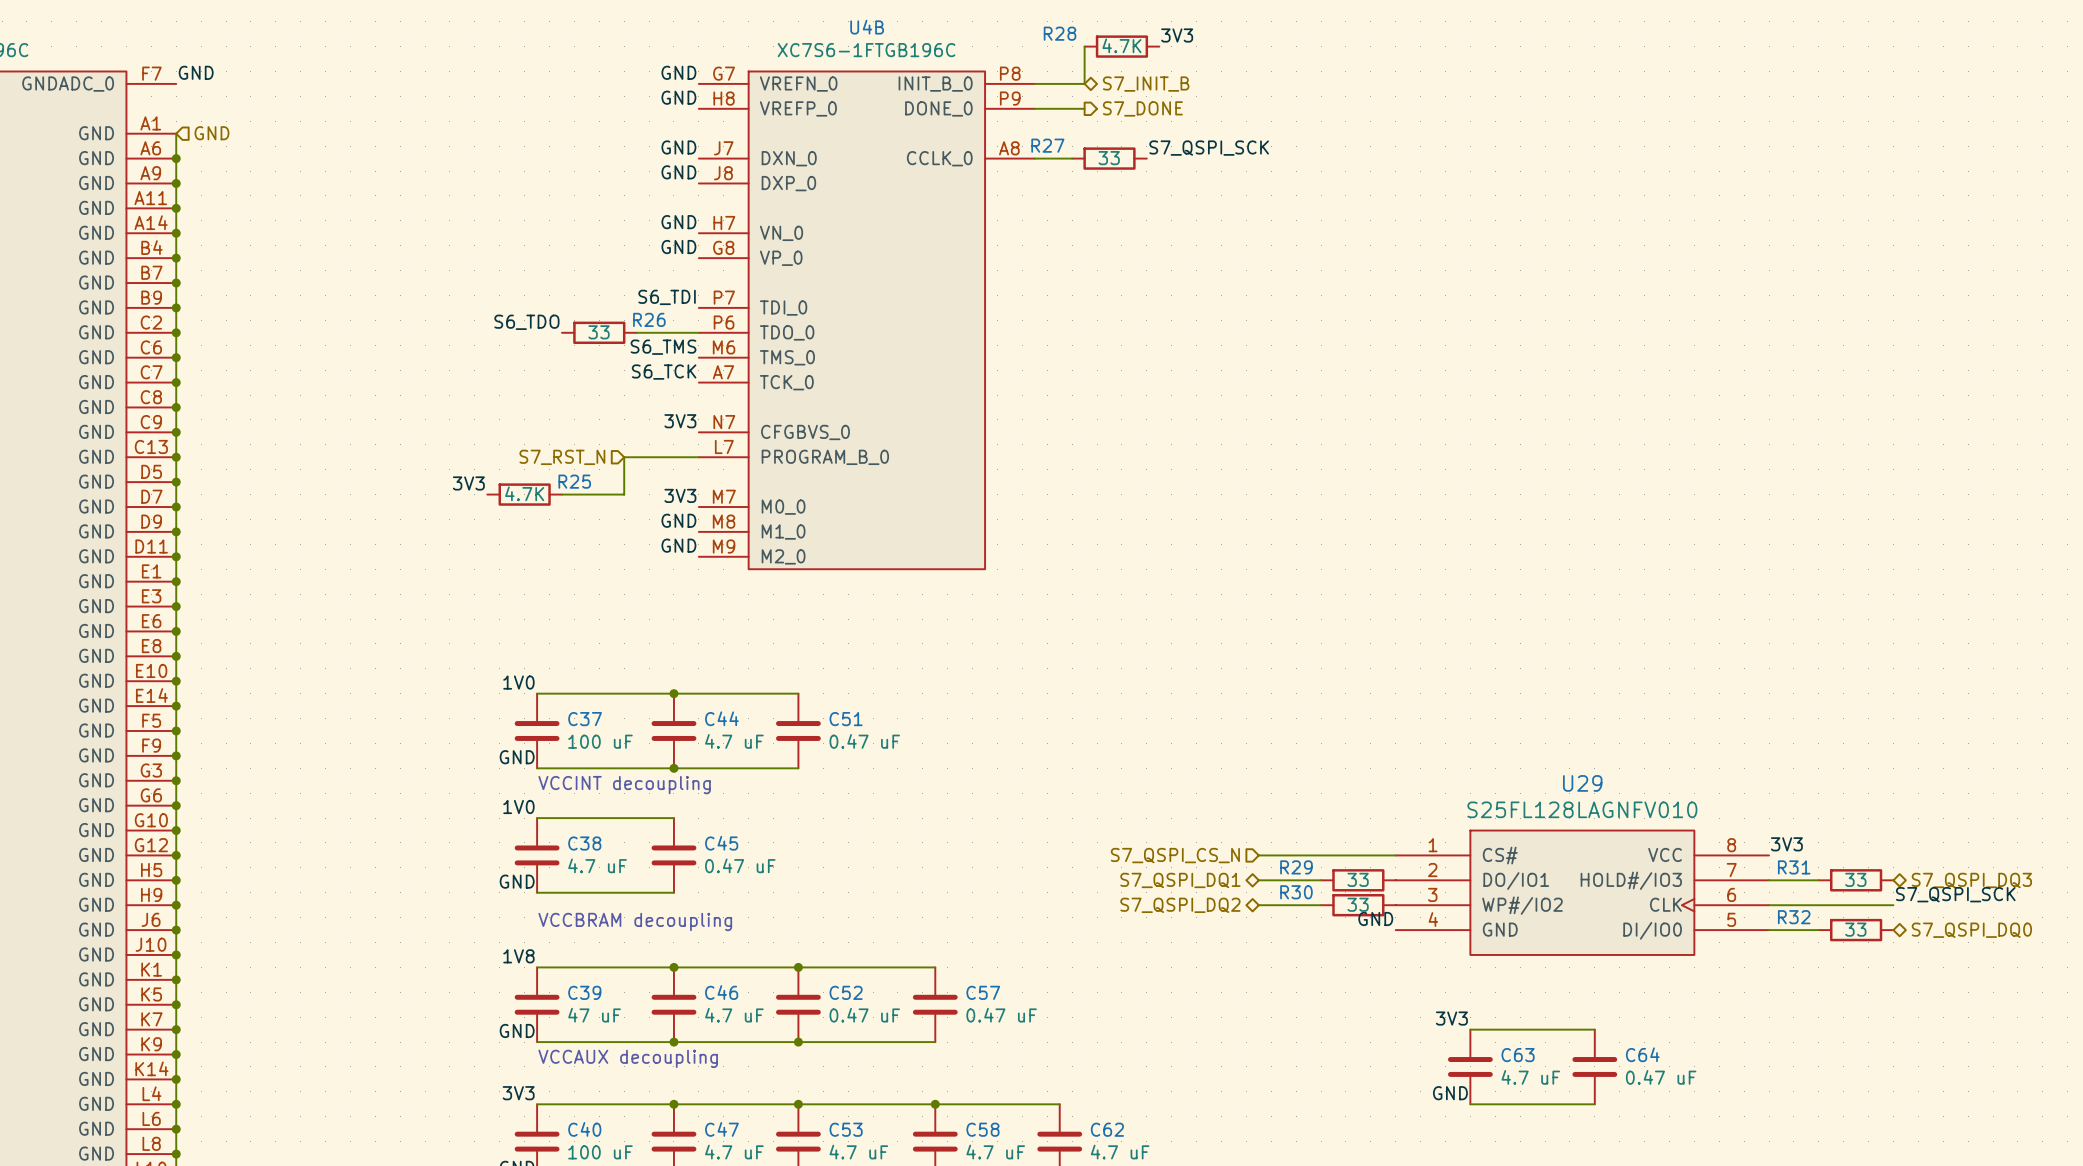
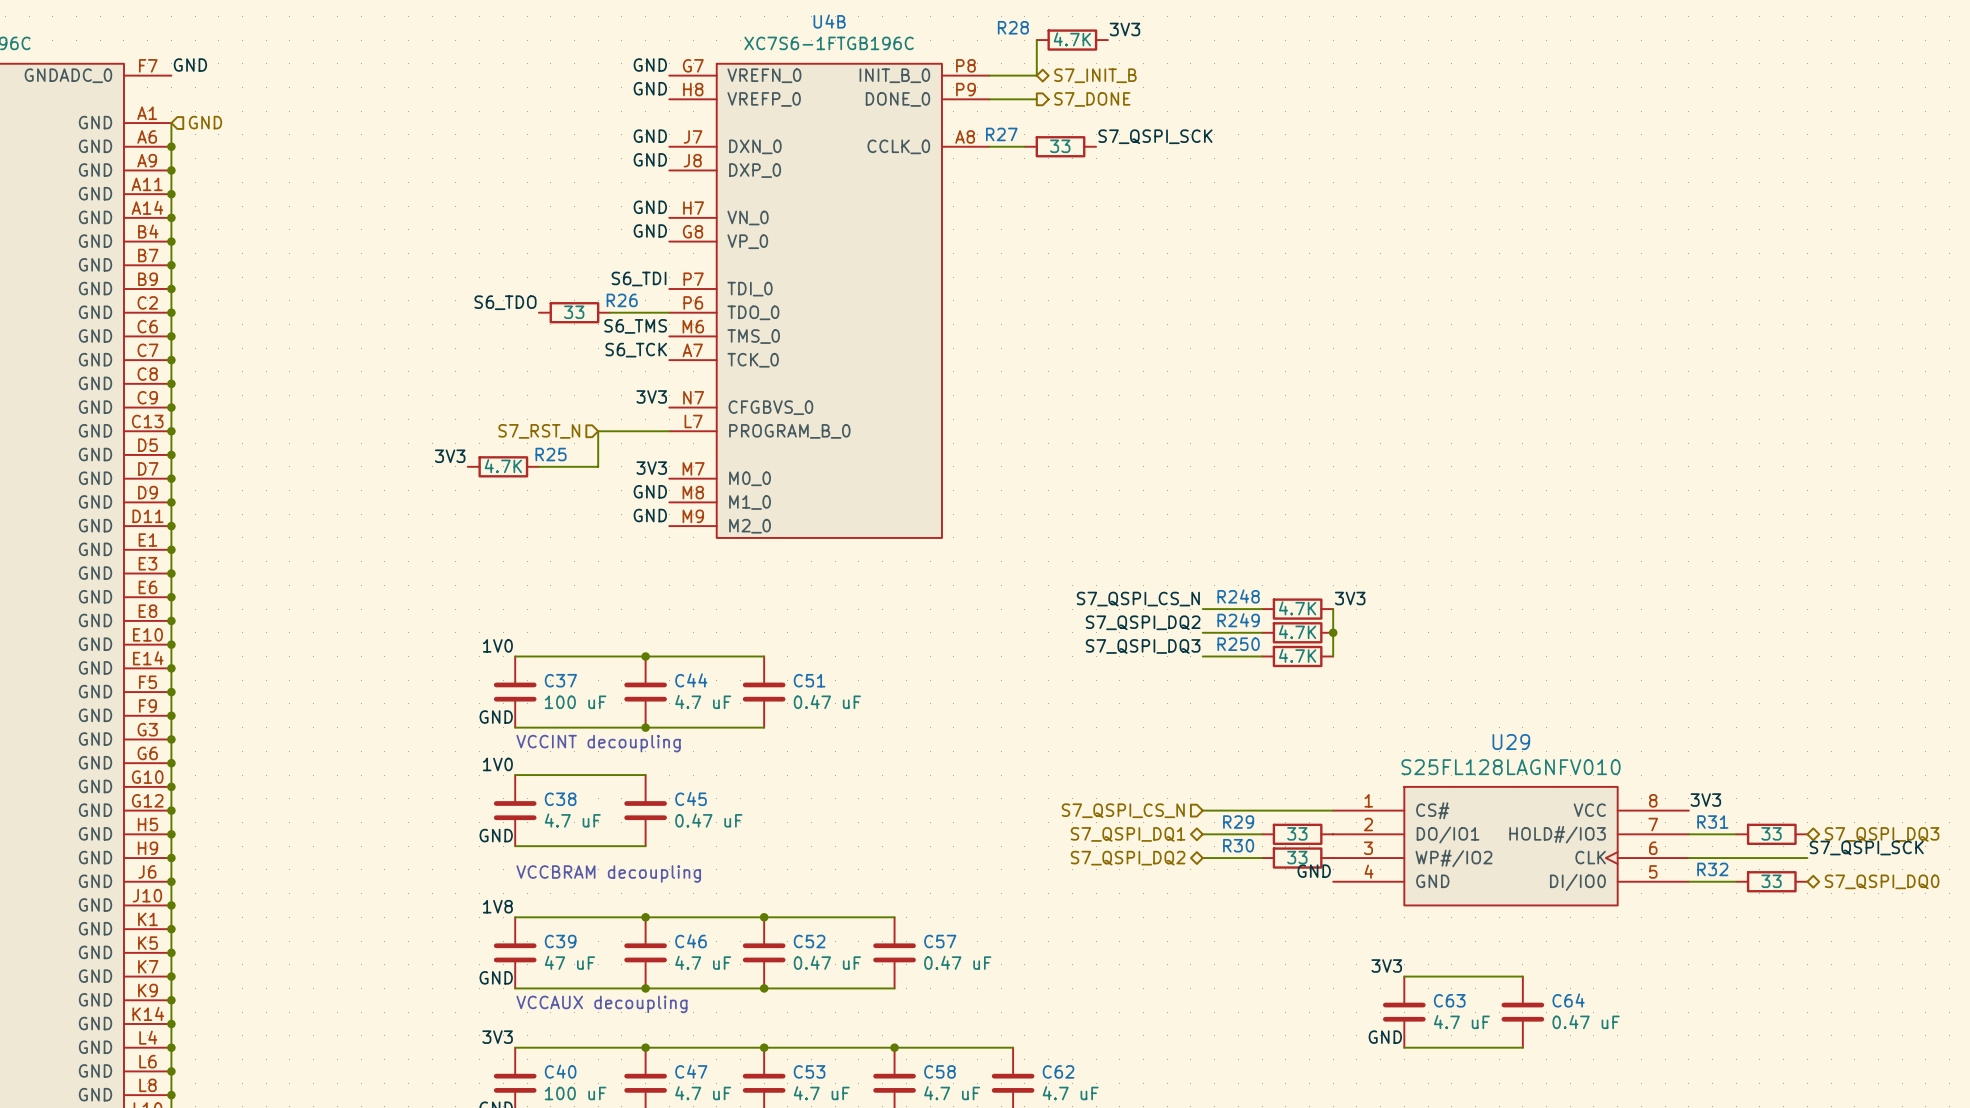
label: none -> 3V3 (1350, 598)
label: none -> S7_QSPI_CS_N (1138, 599)
wire: none -> (1202, 609) (1262, 609)
R248: none -> 4.7K (1297, 609)
wire: none -> (1333, 609) (1333, 656)
label: none -> S7_QSPI_DQ2 (1143, 622)
wire: none -> (1202, 632) (1262, 632)
R249: none -> 4.7K (1297, 632)
junction: none -> (1333, 632)
label: none -> S7_QSPI_DQ3 (1143, 646)
wire: none -> (1202, 656) (1262, 656)
R250: none -> 4.7K (1297, 656)

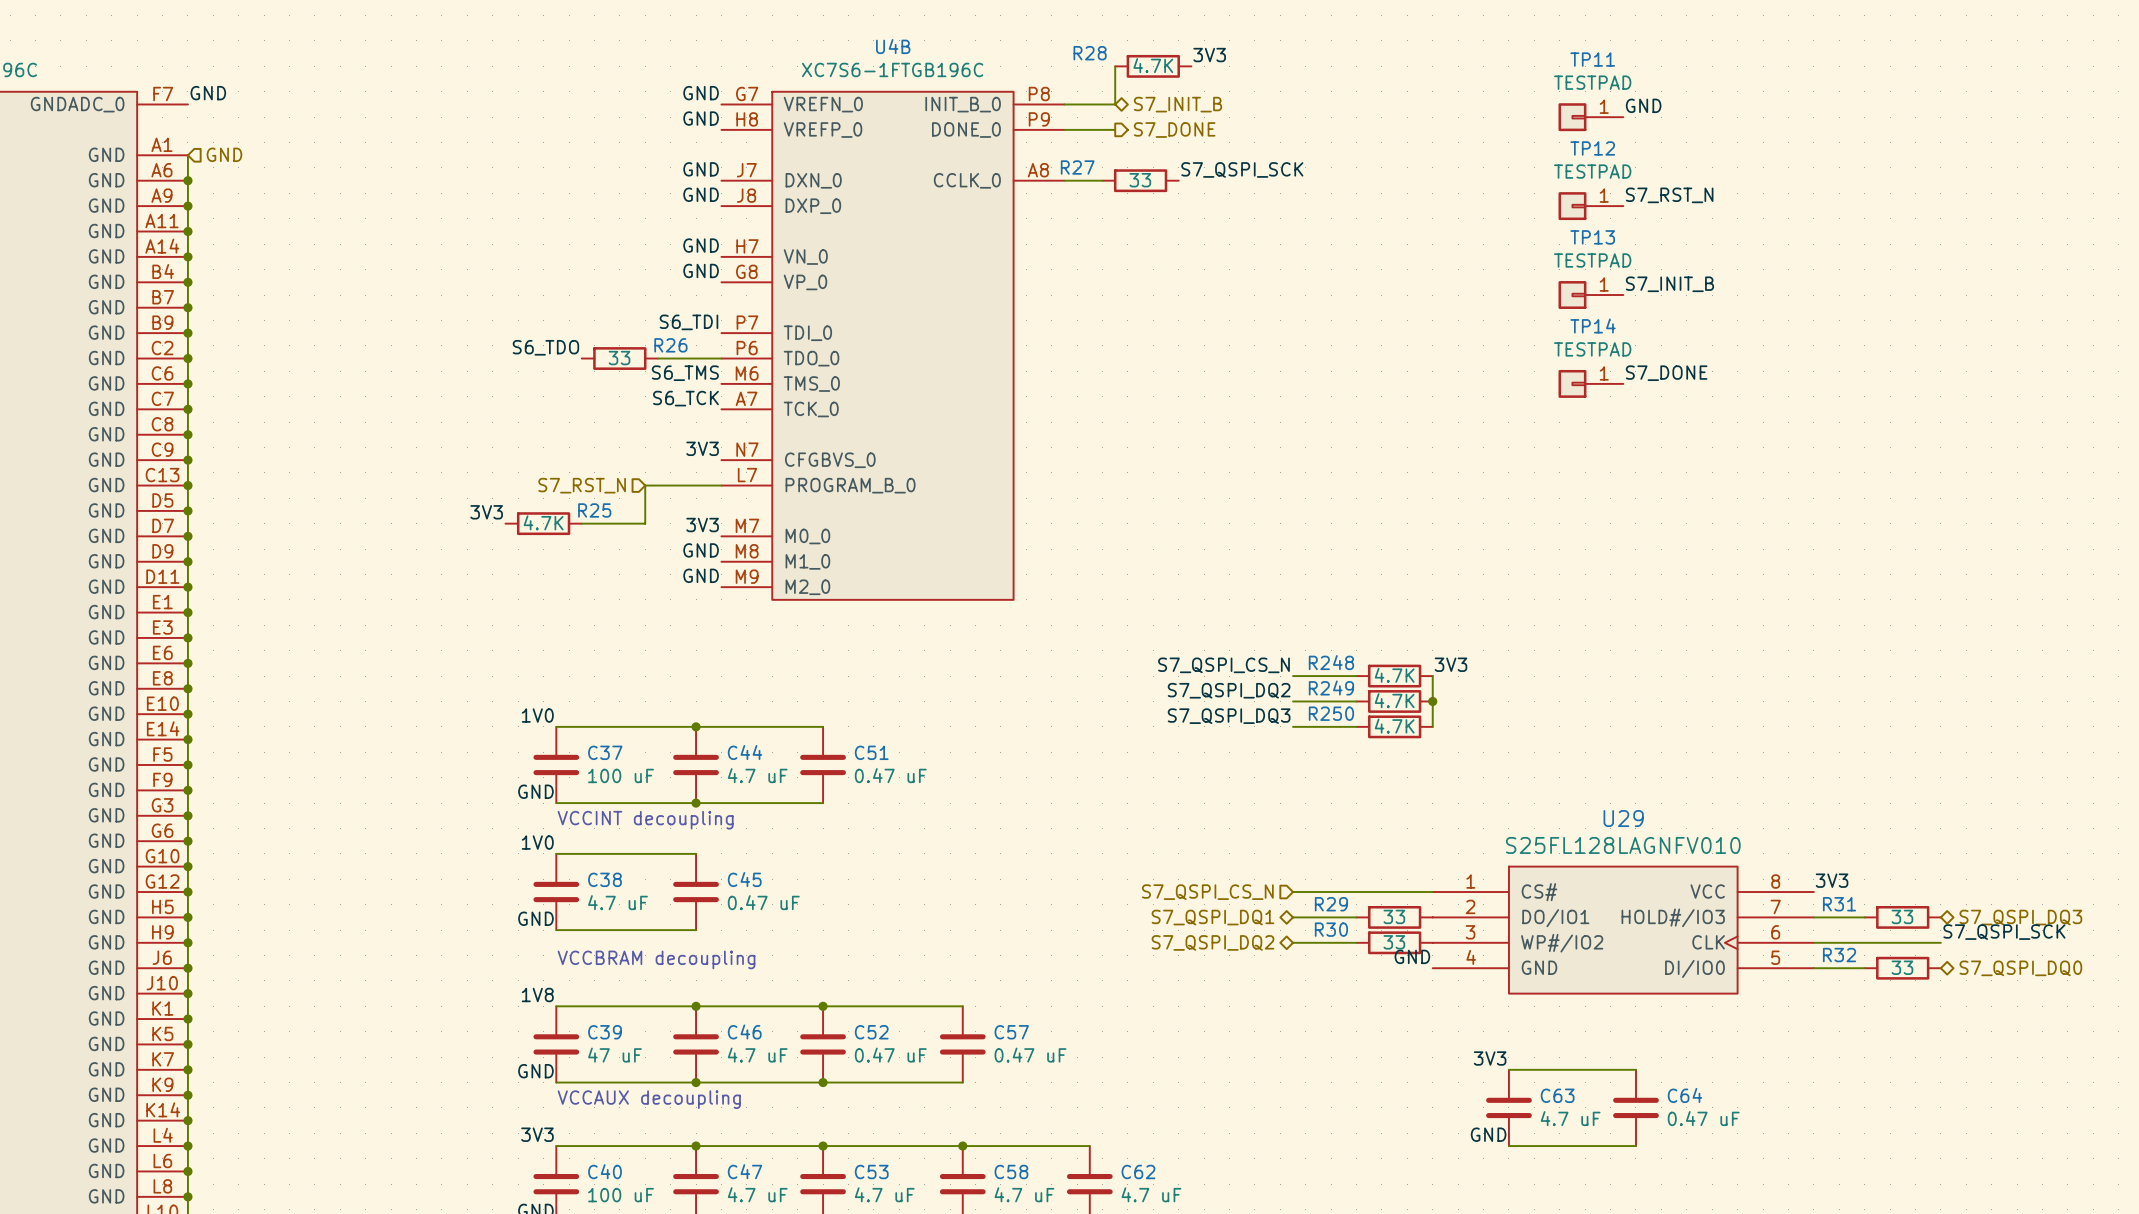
label: none -> GND (1643, 105)
TP11: none -> TESTPAD (1590, 117)
label: none -> S7_RST_N (1669, 195)
TP12: none -> TESTPAD (1590, 206)
label: none -> S7_INIT_B (1669, 284)
TP13: none -> TESTPAD (1590, 295)
label: none -> S7_DONE (1666, 373)
TP14: none -> TESTPAD (1590, 383)

